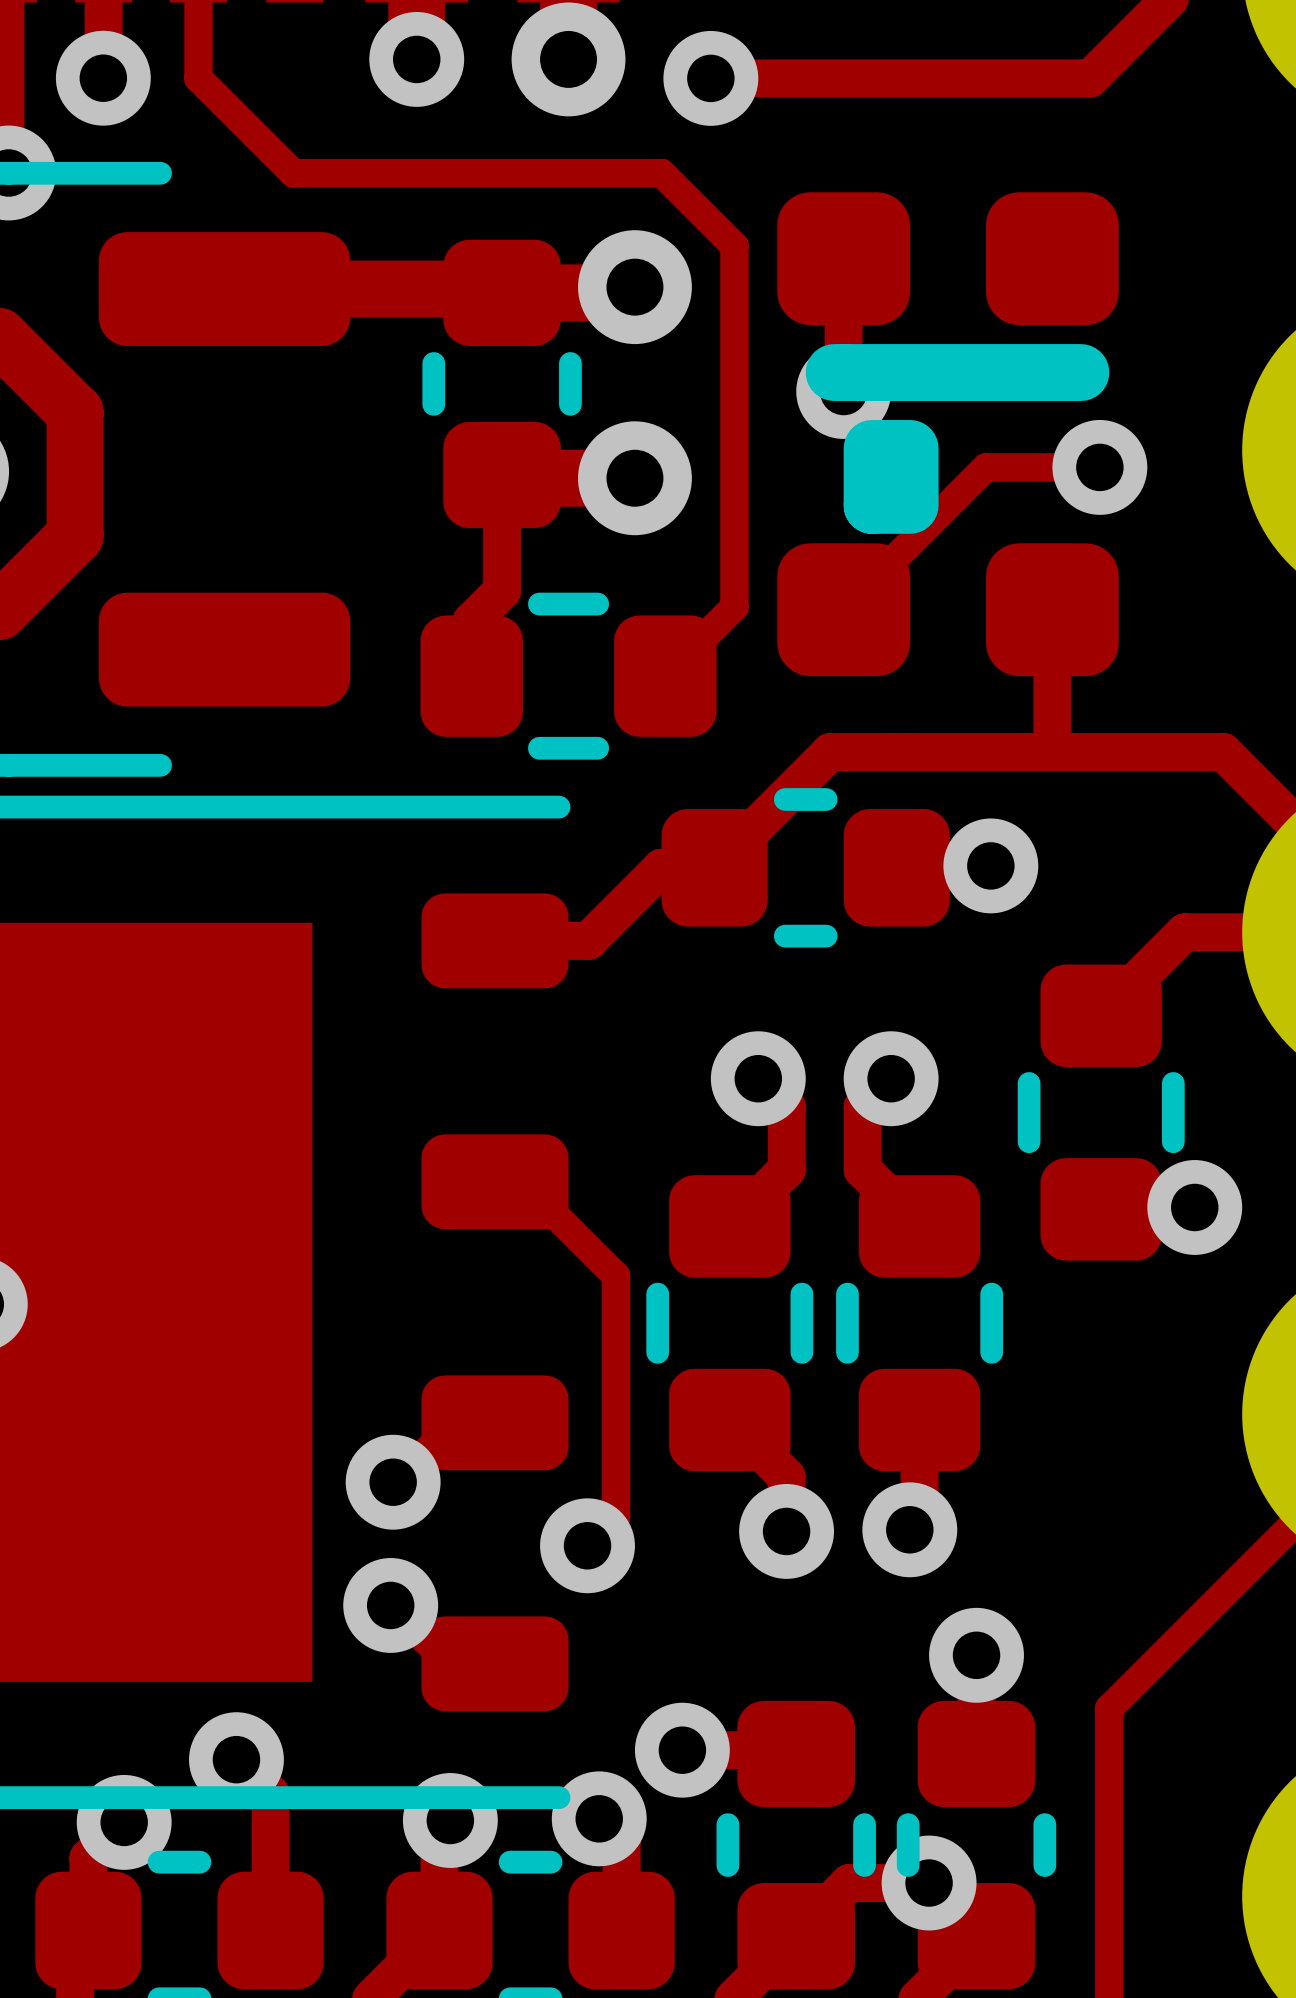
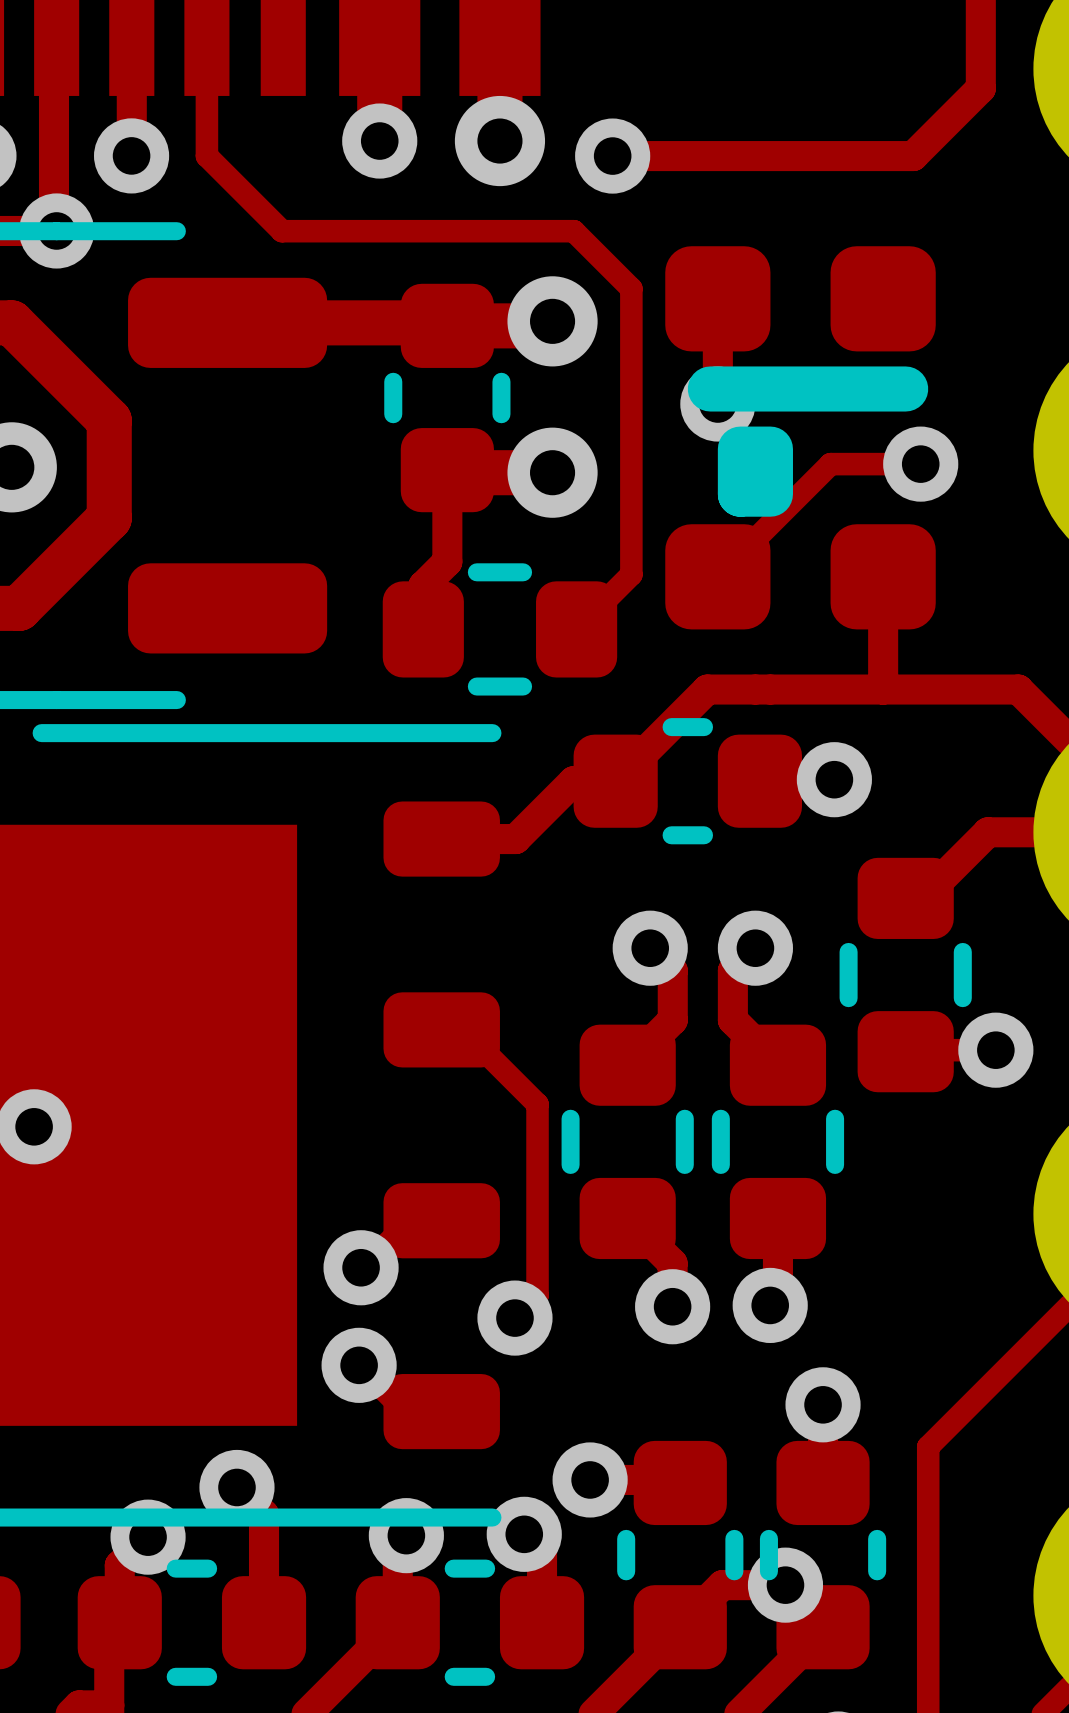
part position: (1101, 1112) -> (905, 975)

